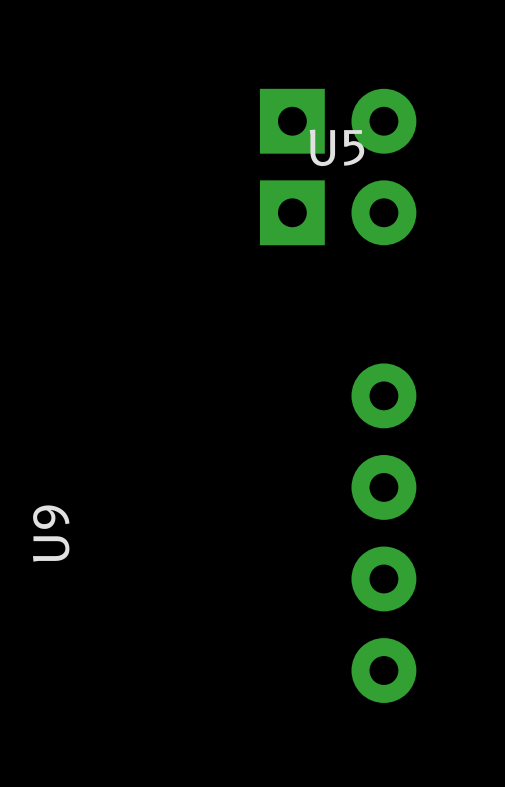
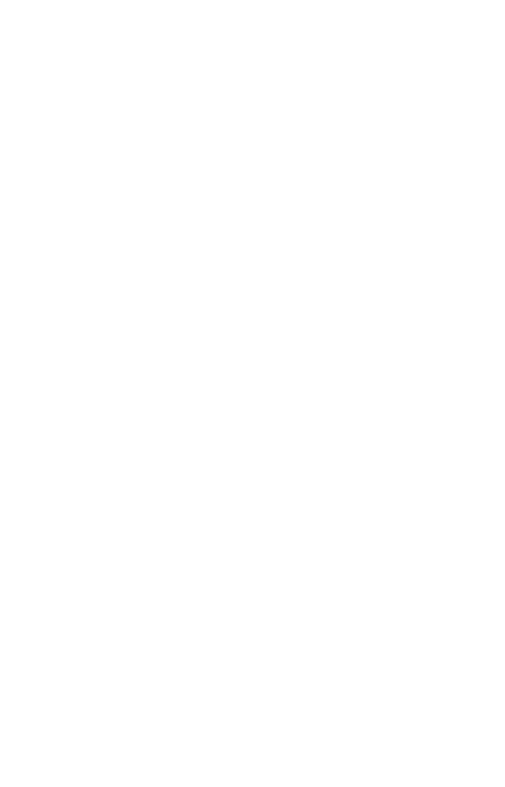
U5: (338, 167) -> none
U9: (383, 533) -> none

